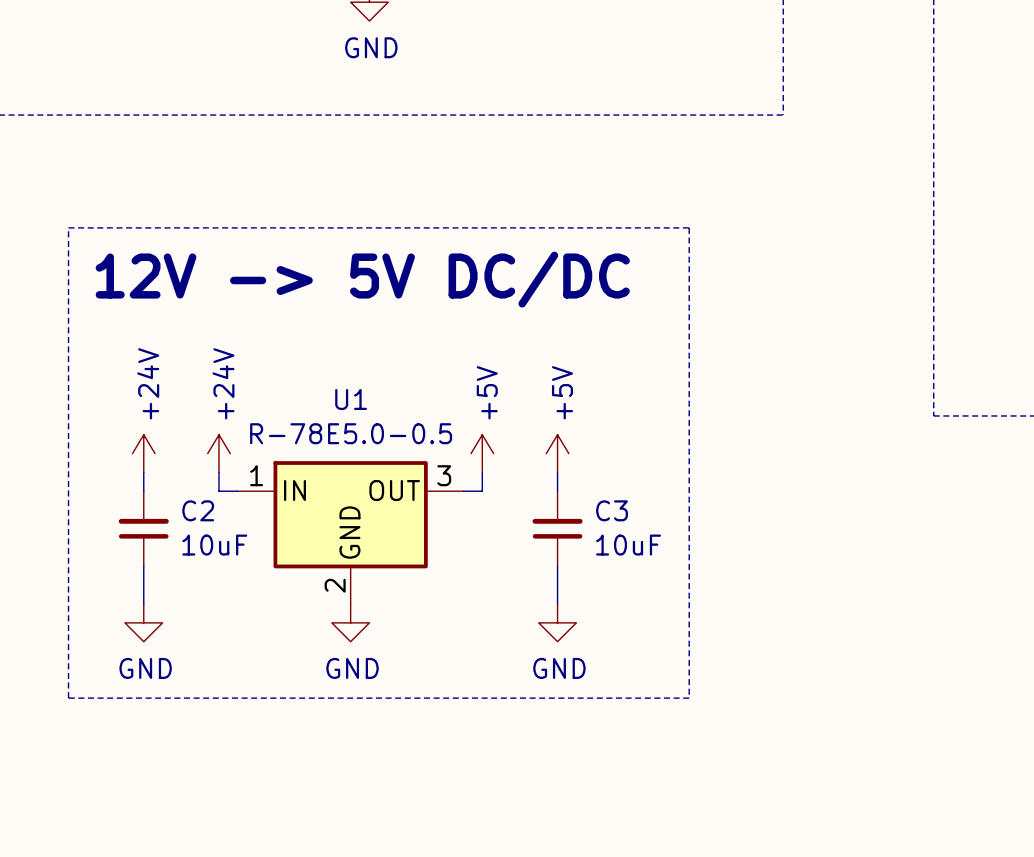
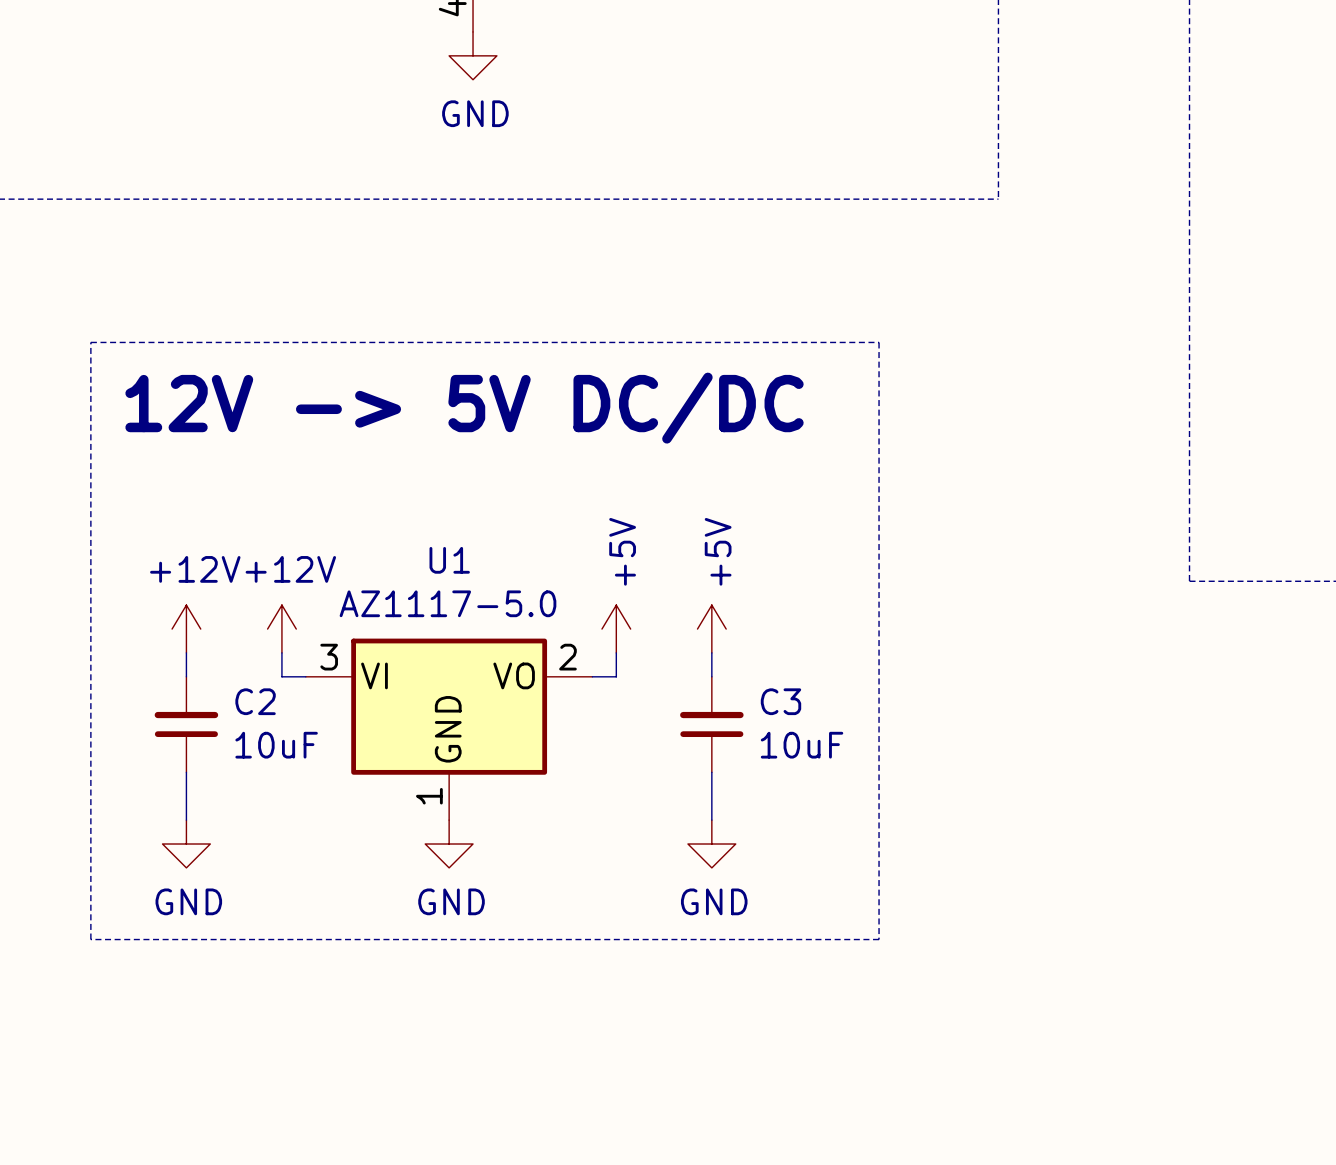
U1 value: R-78E5.0-0.5 (351, 433) -> AZ1117-5.0 (447, 603)
power symbol: +24V (143, 453) -> +12V (186, 629)
power symbol: +24V (218, 453) -> +12V (281, 629)
U1 pin number: 1 (256, 475) -> 3 (329, 657)
U1 pin number: 3 (444, 475) -> 2 (567, 657)
U1 pin name: IN (294, 490) -> VI (374, 675)
U1 pin name: OUT (394, 490) -> VO (514, 675)
U1 pin number: 2 (335, 585) -> 1 (429, 796)

